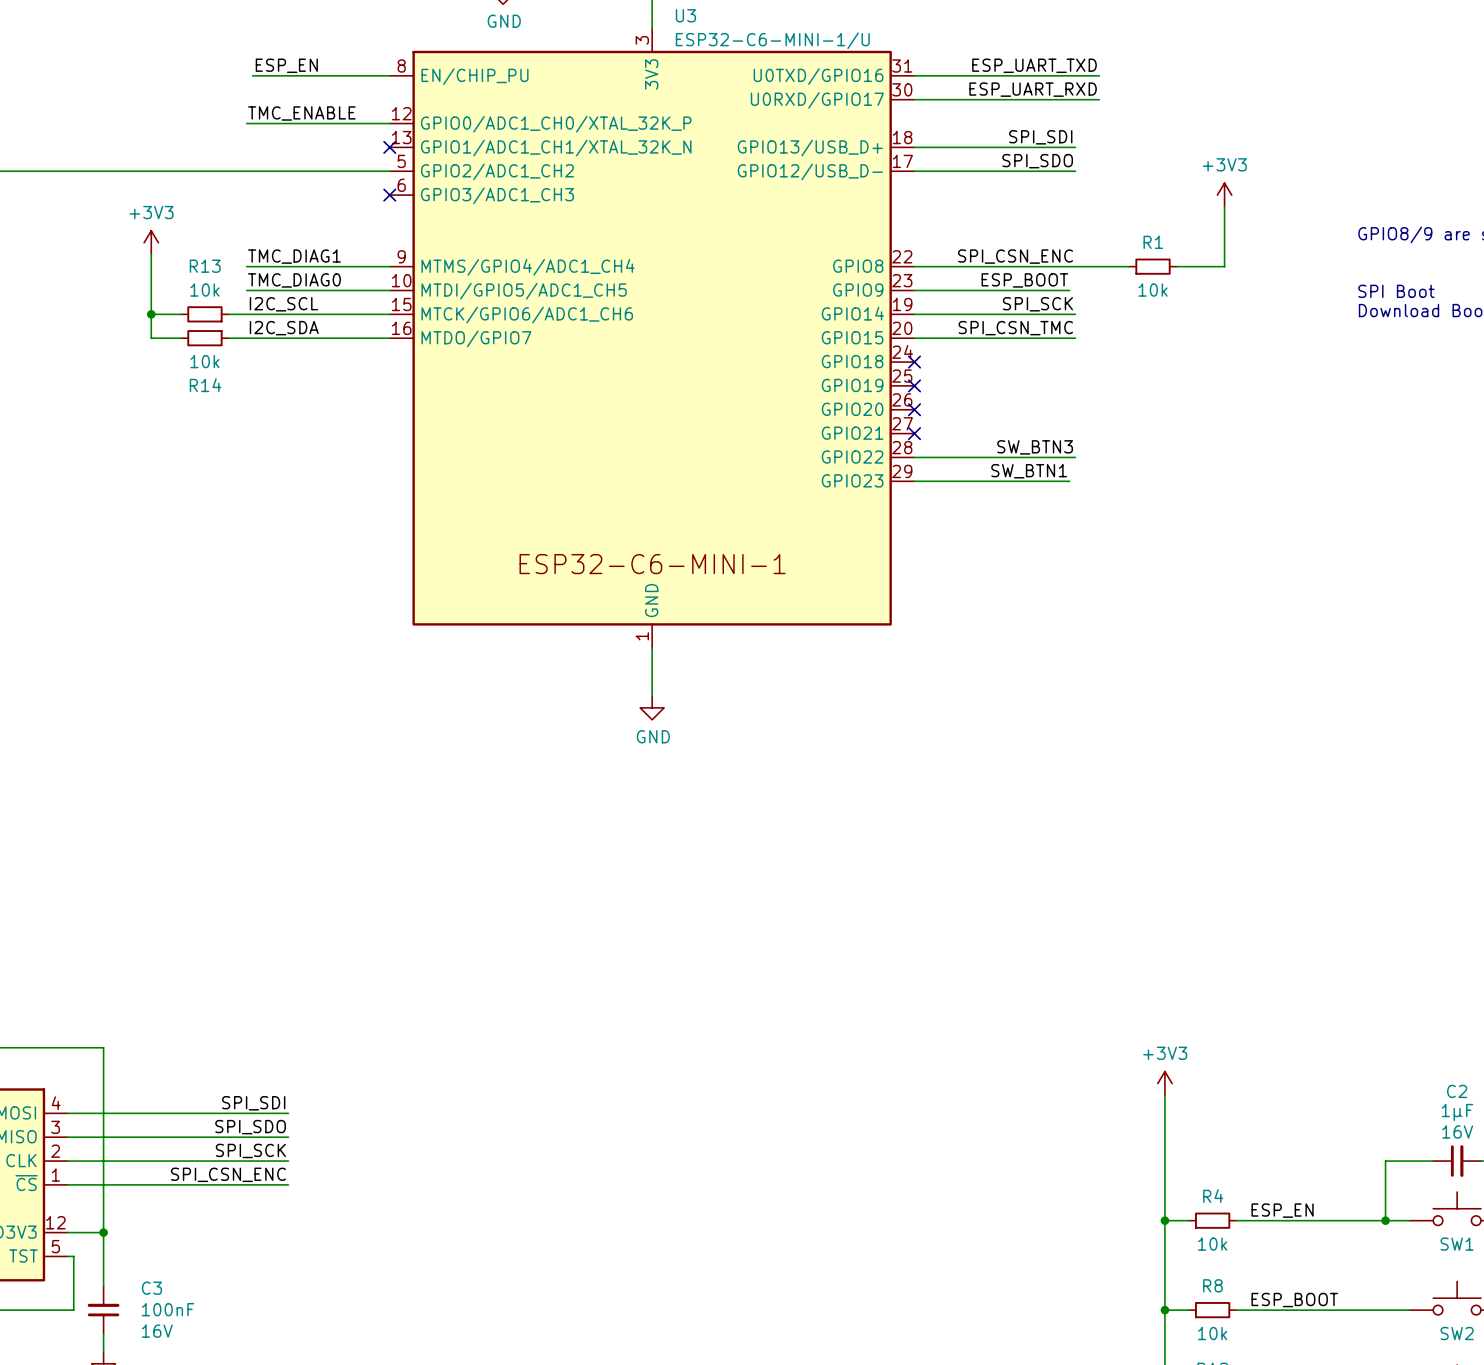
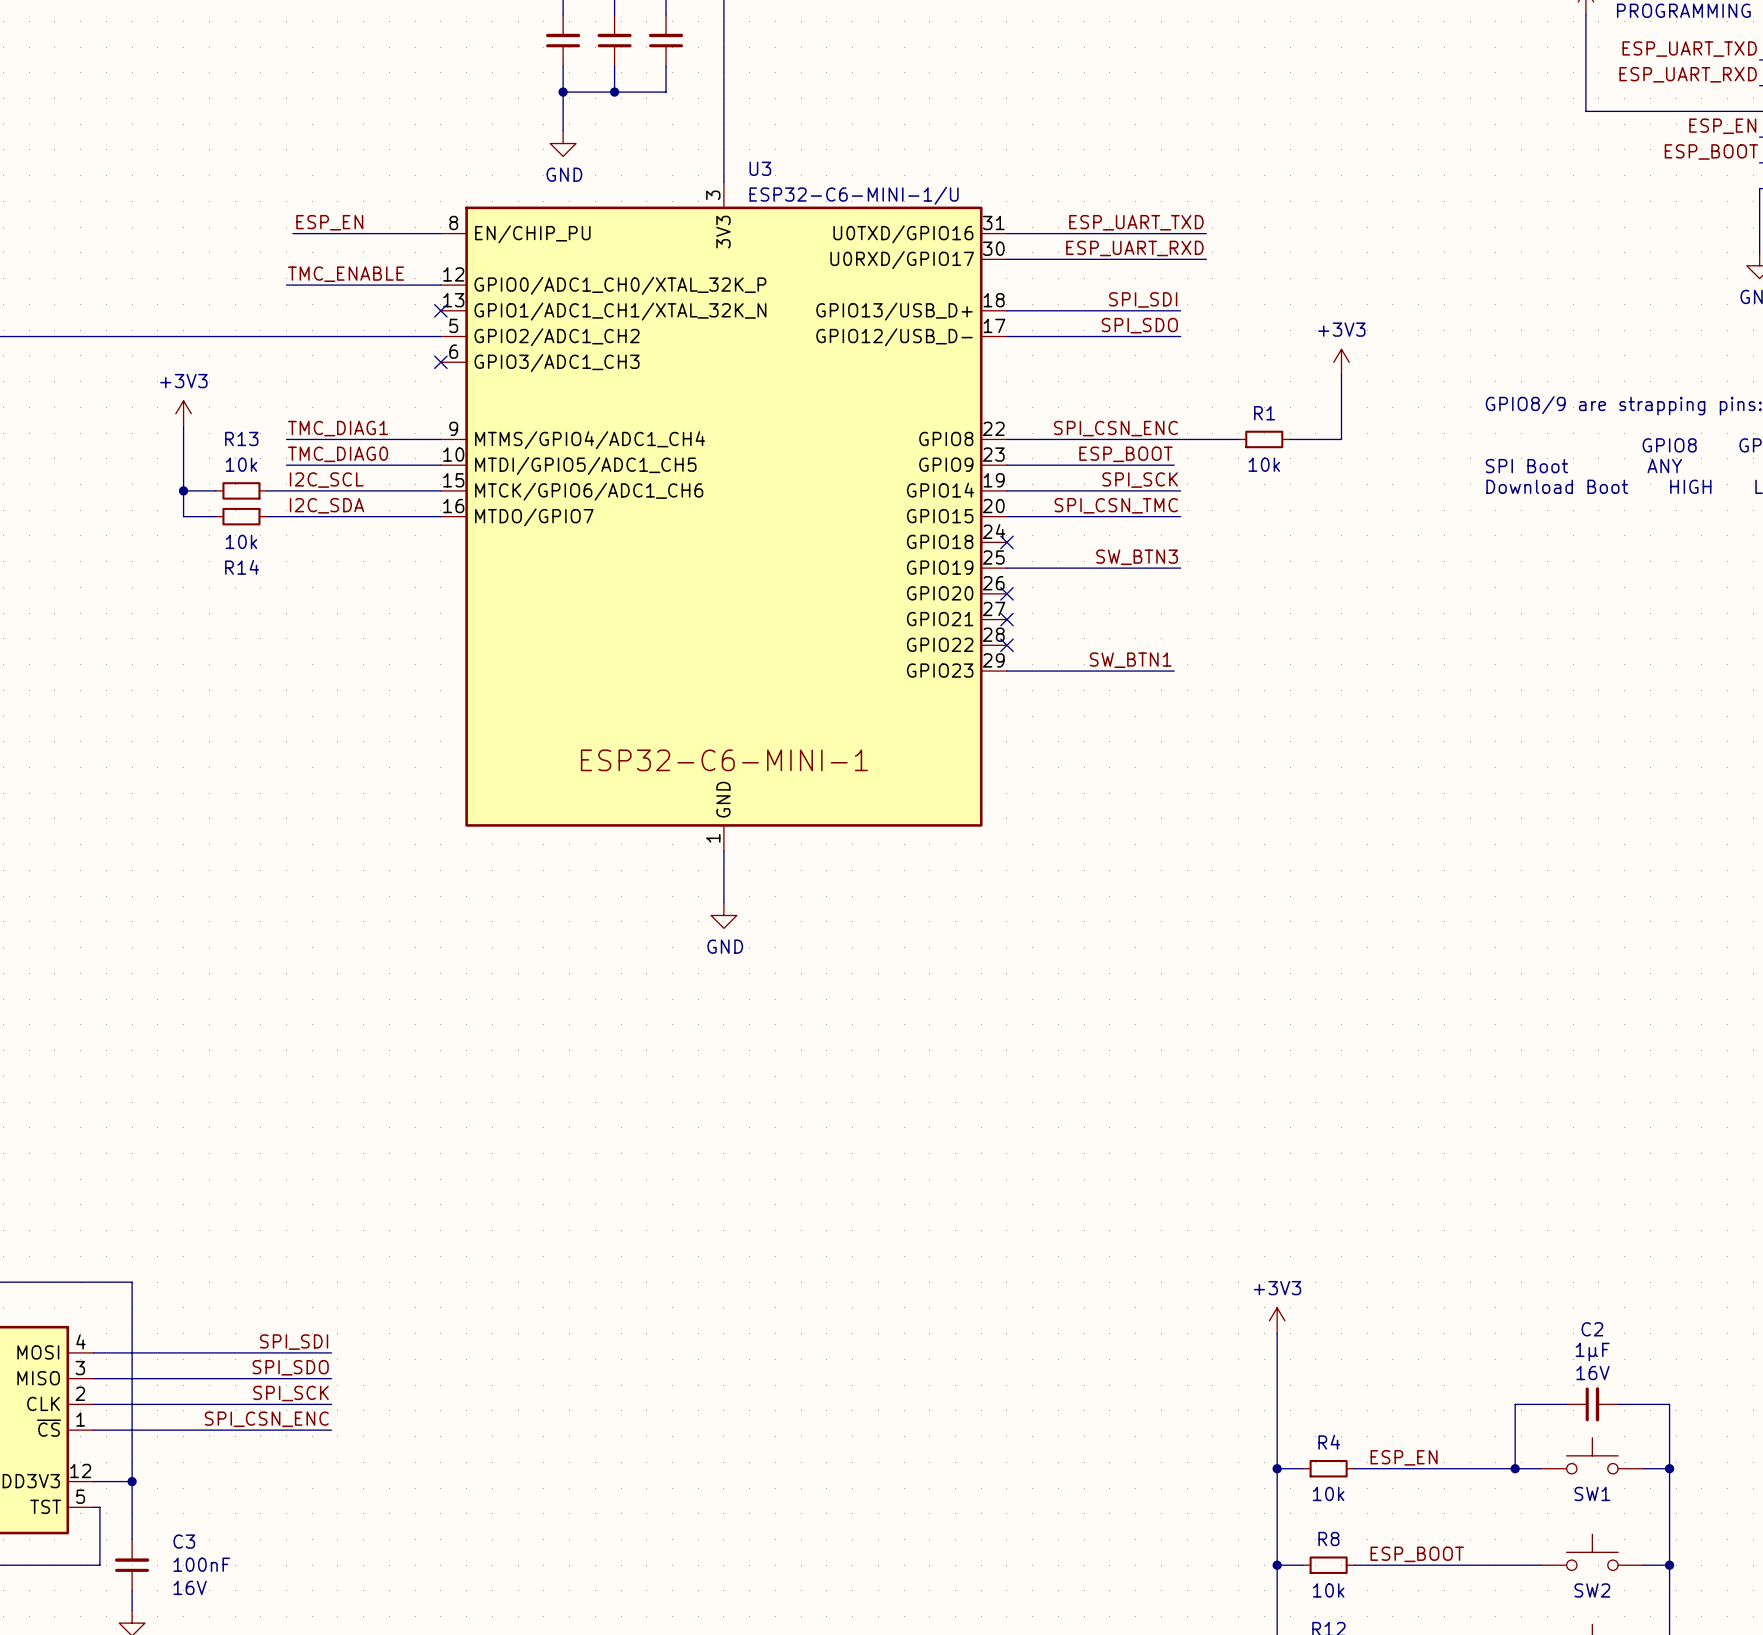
no-connect mark: (914, 385) -> none
label position: SW_BTN3 (1035, 447) -> SW_BTN3 (1137, 557)
wire: (914, 457) (1075, 457) -> (1006, 568) (1180, 568)
no-connect mark: none -> (1006, 645)

